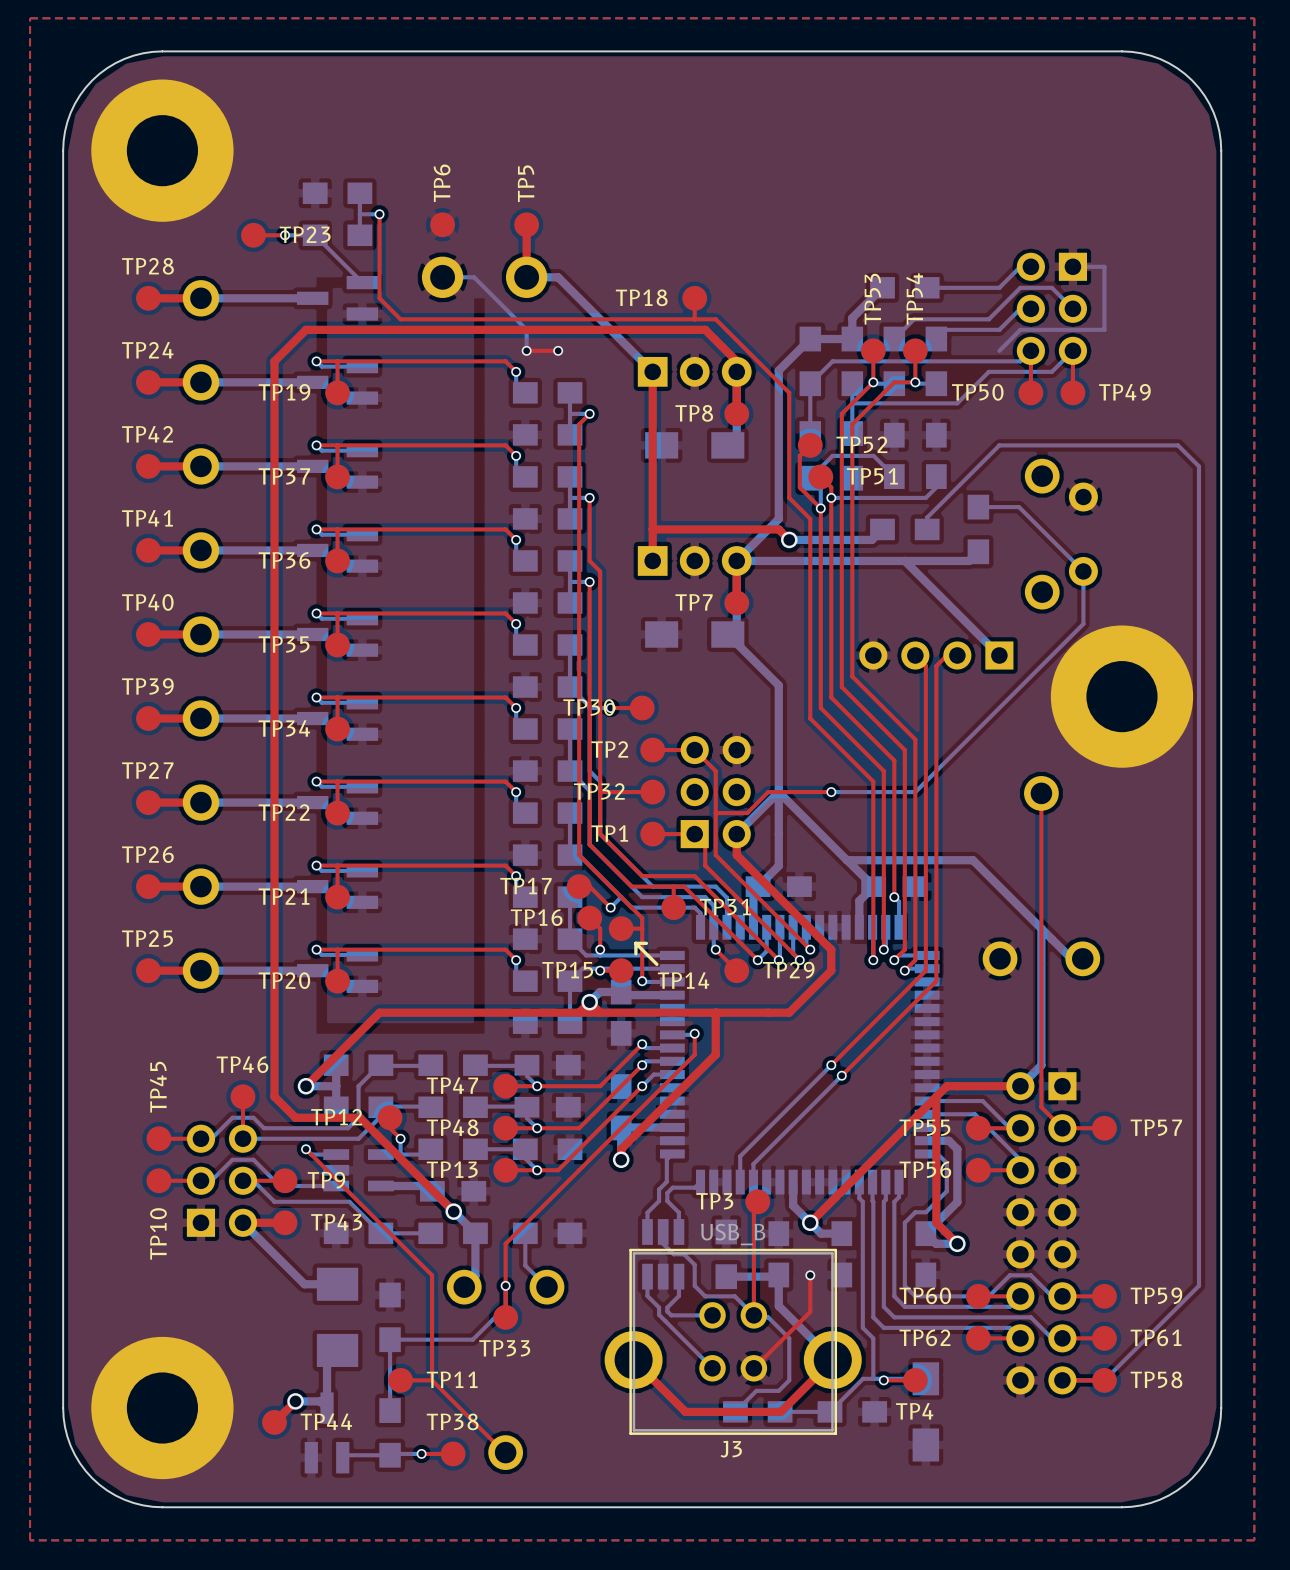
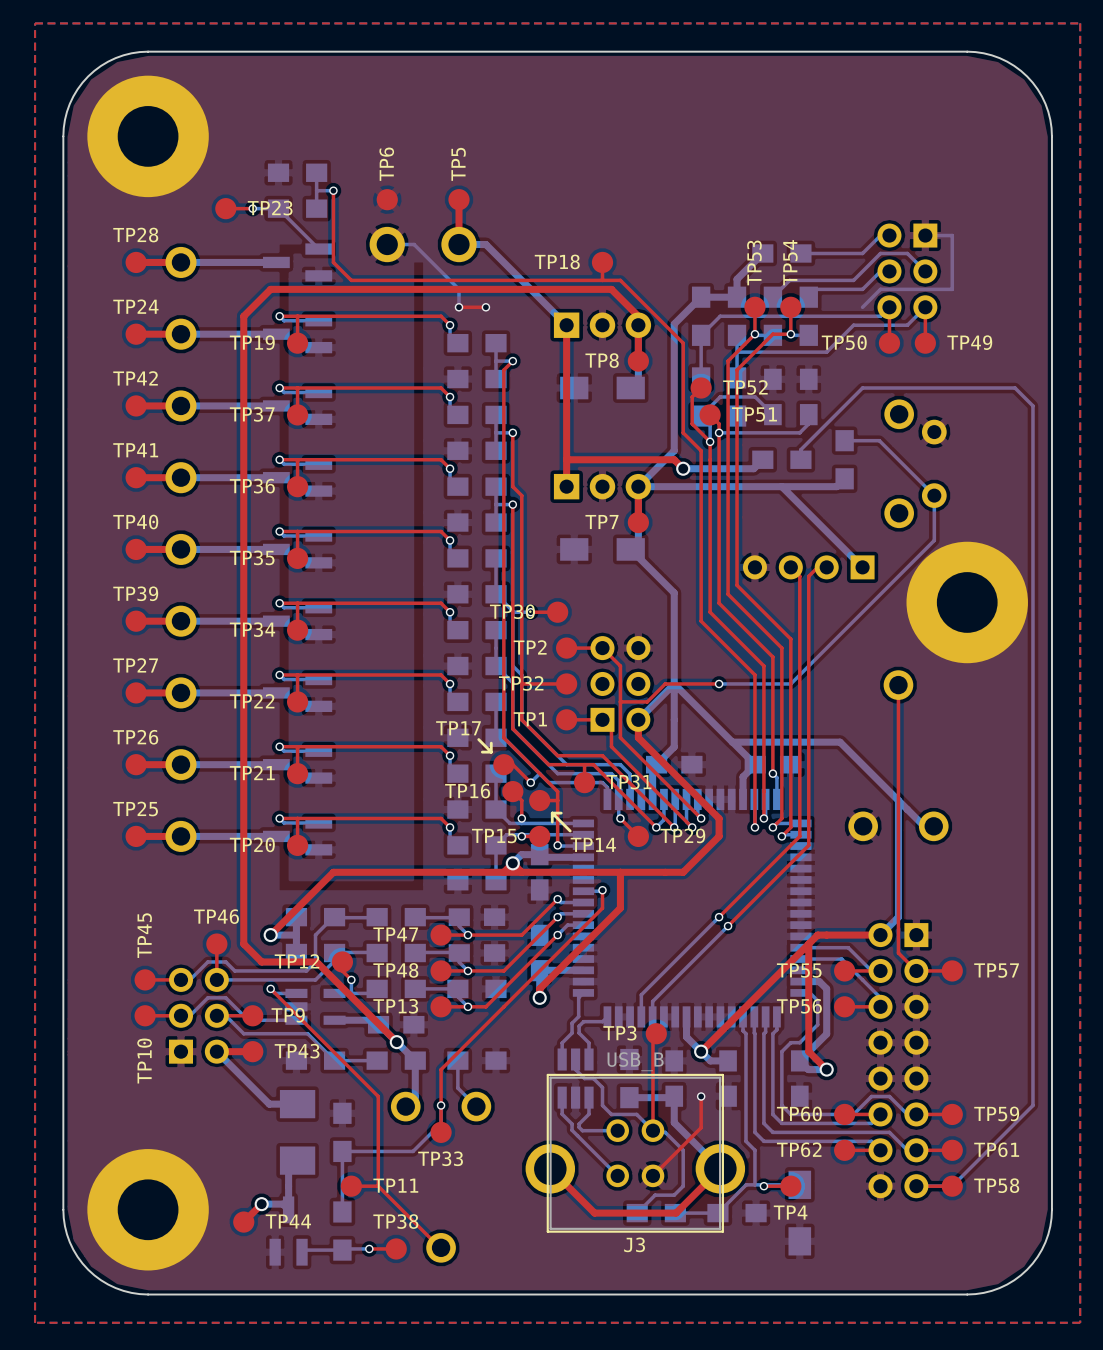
line: none -> (478, 739) (491, 752)
line: none -> (491, 743) (491, 752)
line: none -> (482, 752) (491, 752)
TP17 name position: TP17 (525, 886) -> TP17 (458, 728)

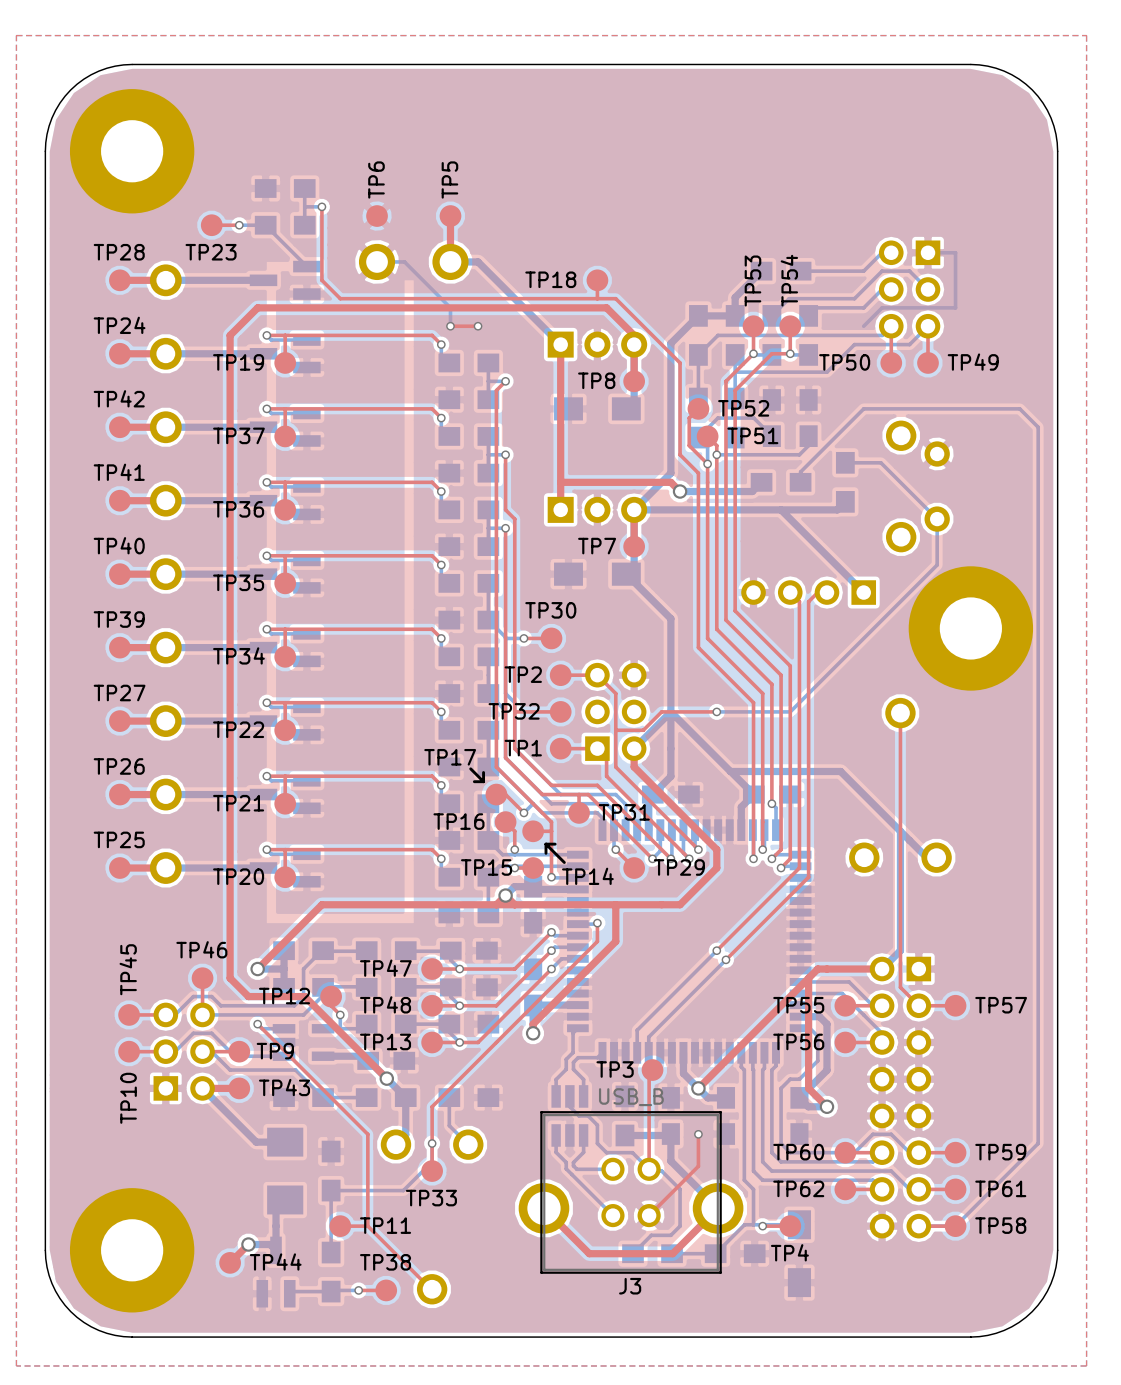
TP23 name position: TP23 (270, 208) -> TP23 (211, 252)
TP30 name position: TP30 (512, 611) -> TP30 (550, 610)

